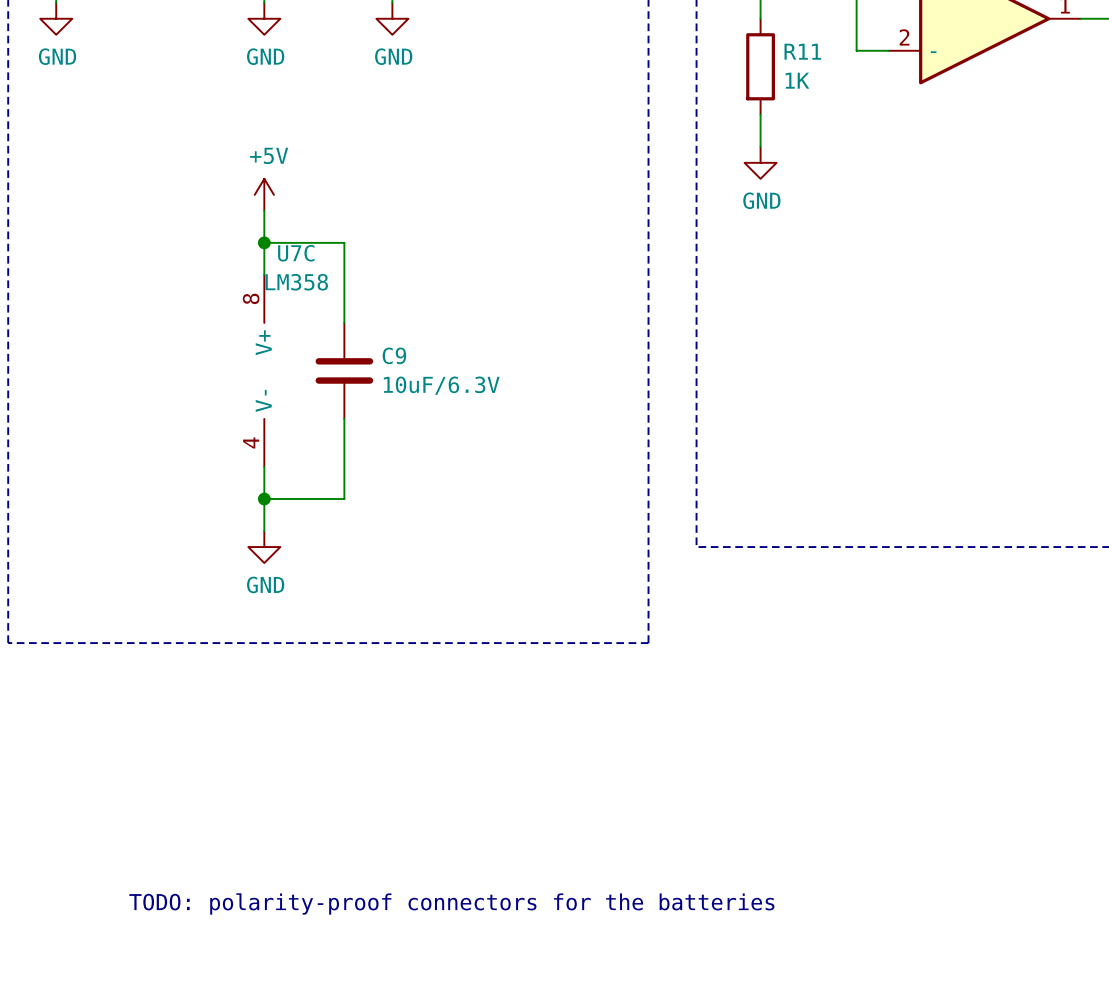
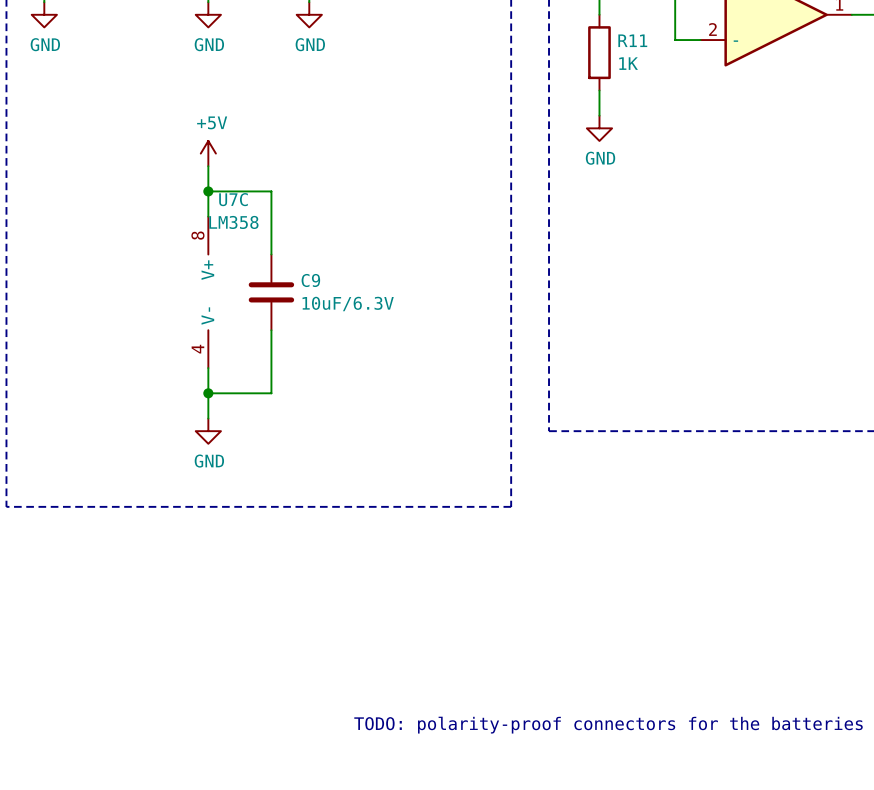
text: TODO: polarity-proof connectors for the batteries (451, 903) -> none
text: none -> TODO: polarity-proof connectors for the batteries (608, 725)

